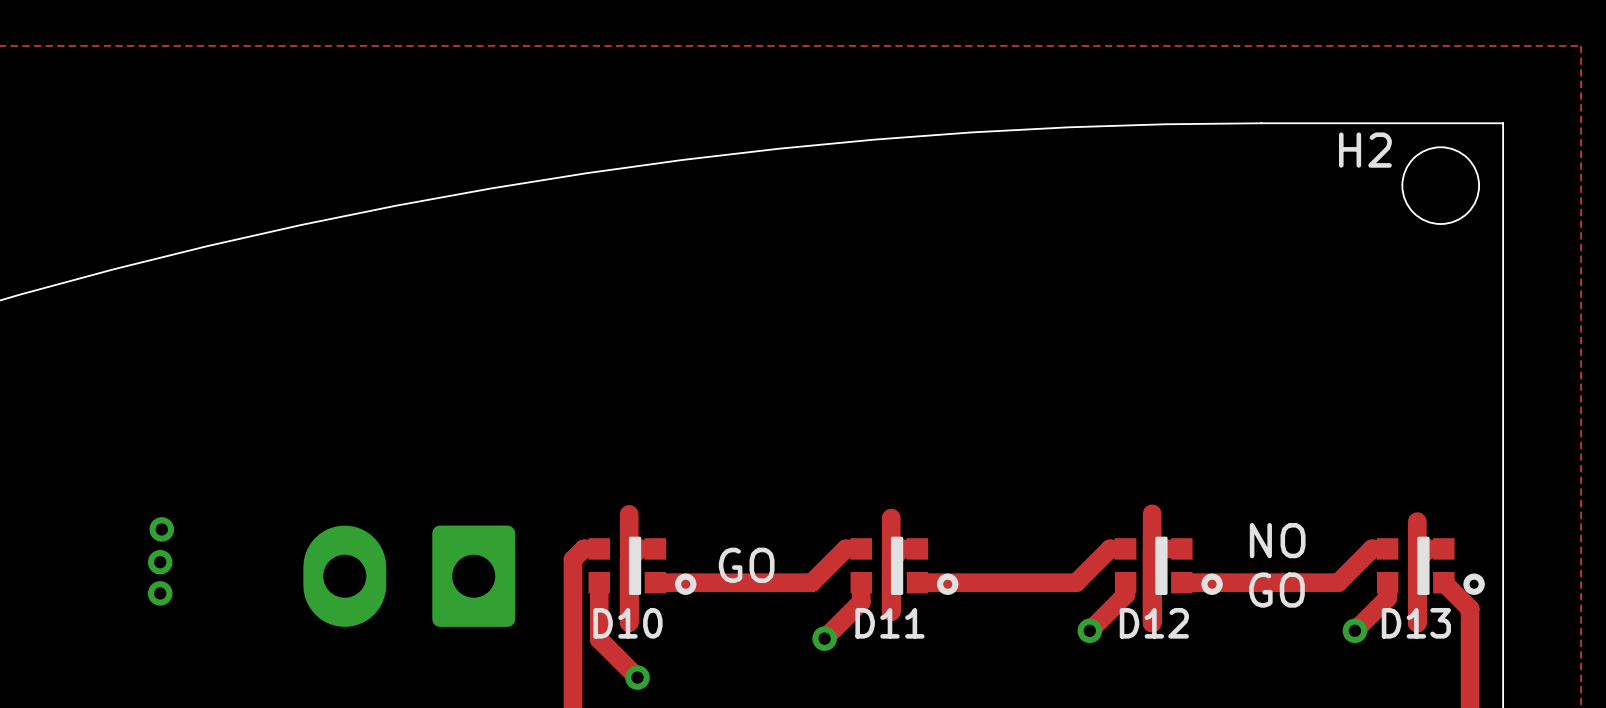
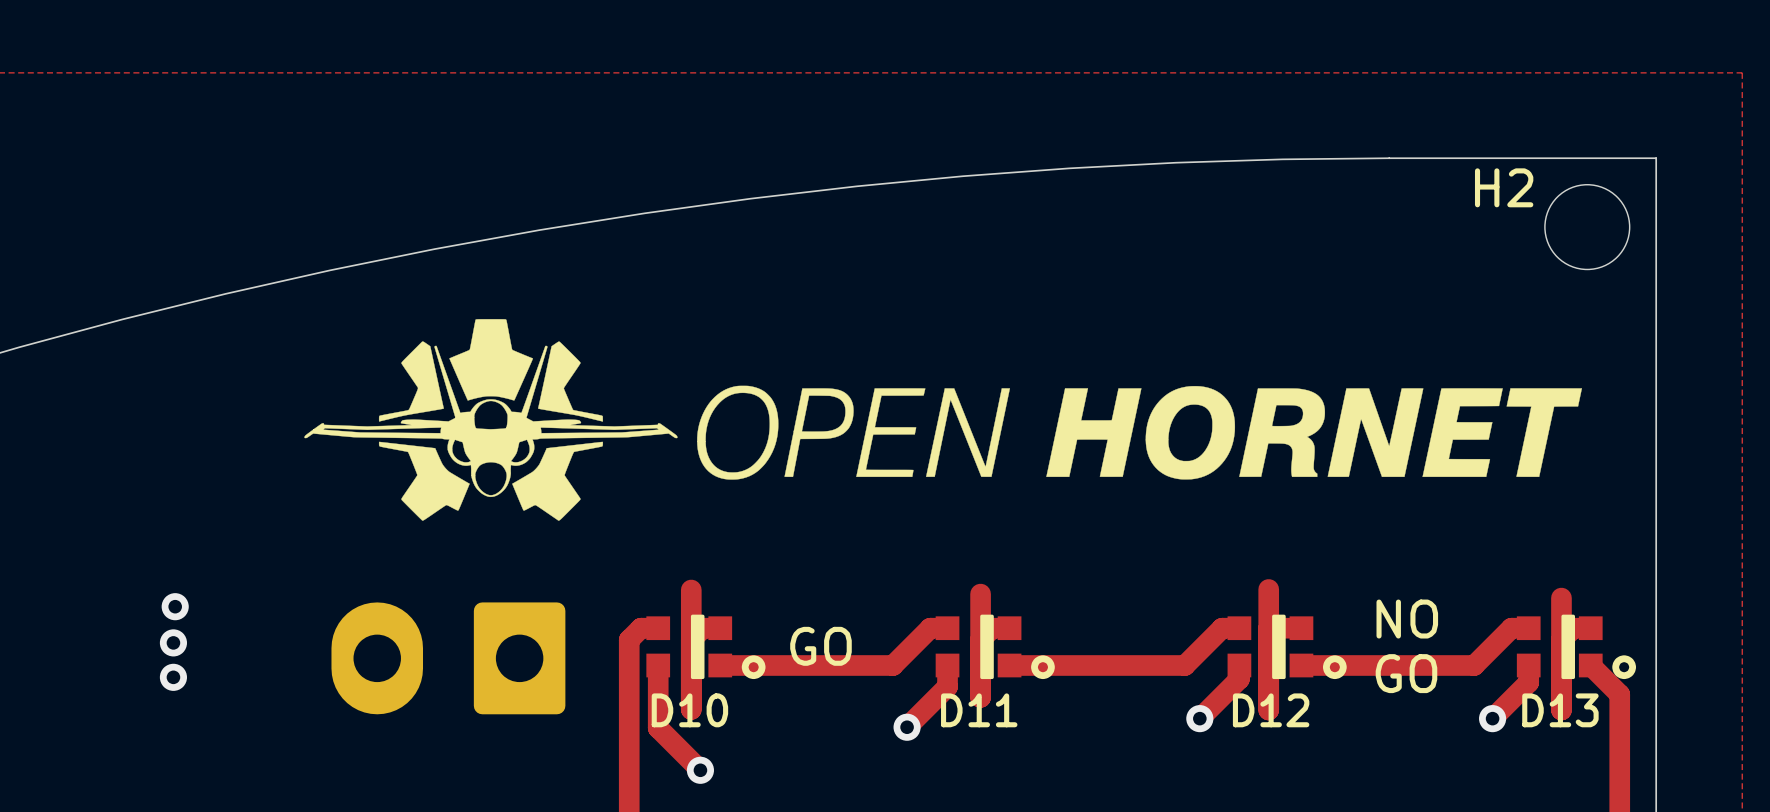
drawing: none -> [304, 319, 1582, 521]

